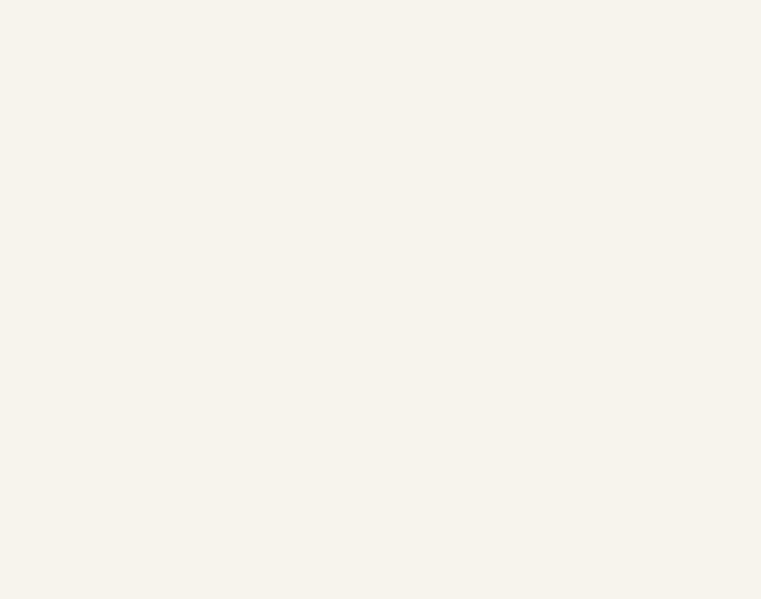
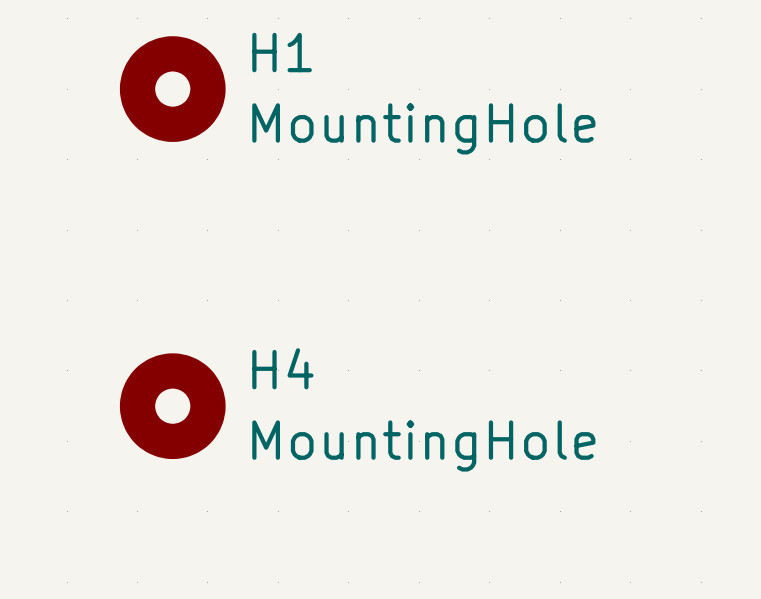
H1: none -> MountingHole (172, 89)
H4: none -> MountingHole (172, 406)

